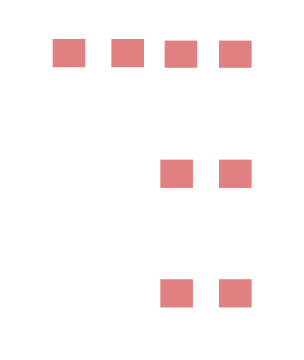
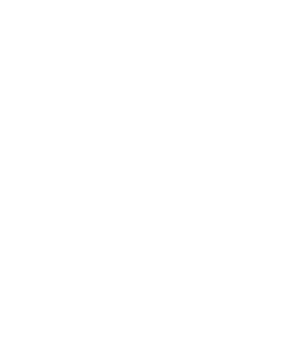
part: (98, 53) -> none
part: (208, 54) -> none
part: (205, 173) -> none
part: (205, 293) -> none

